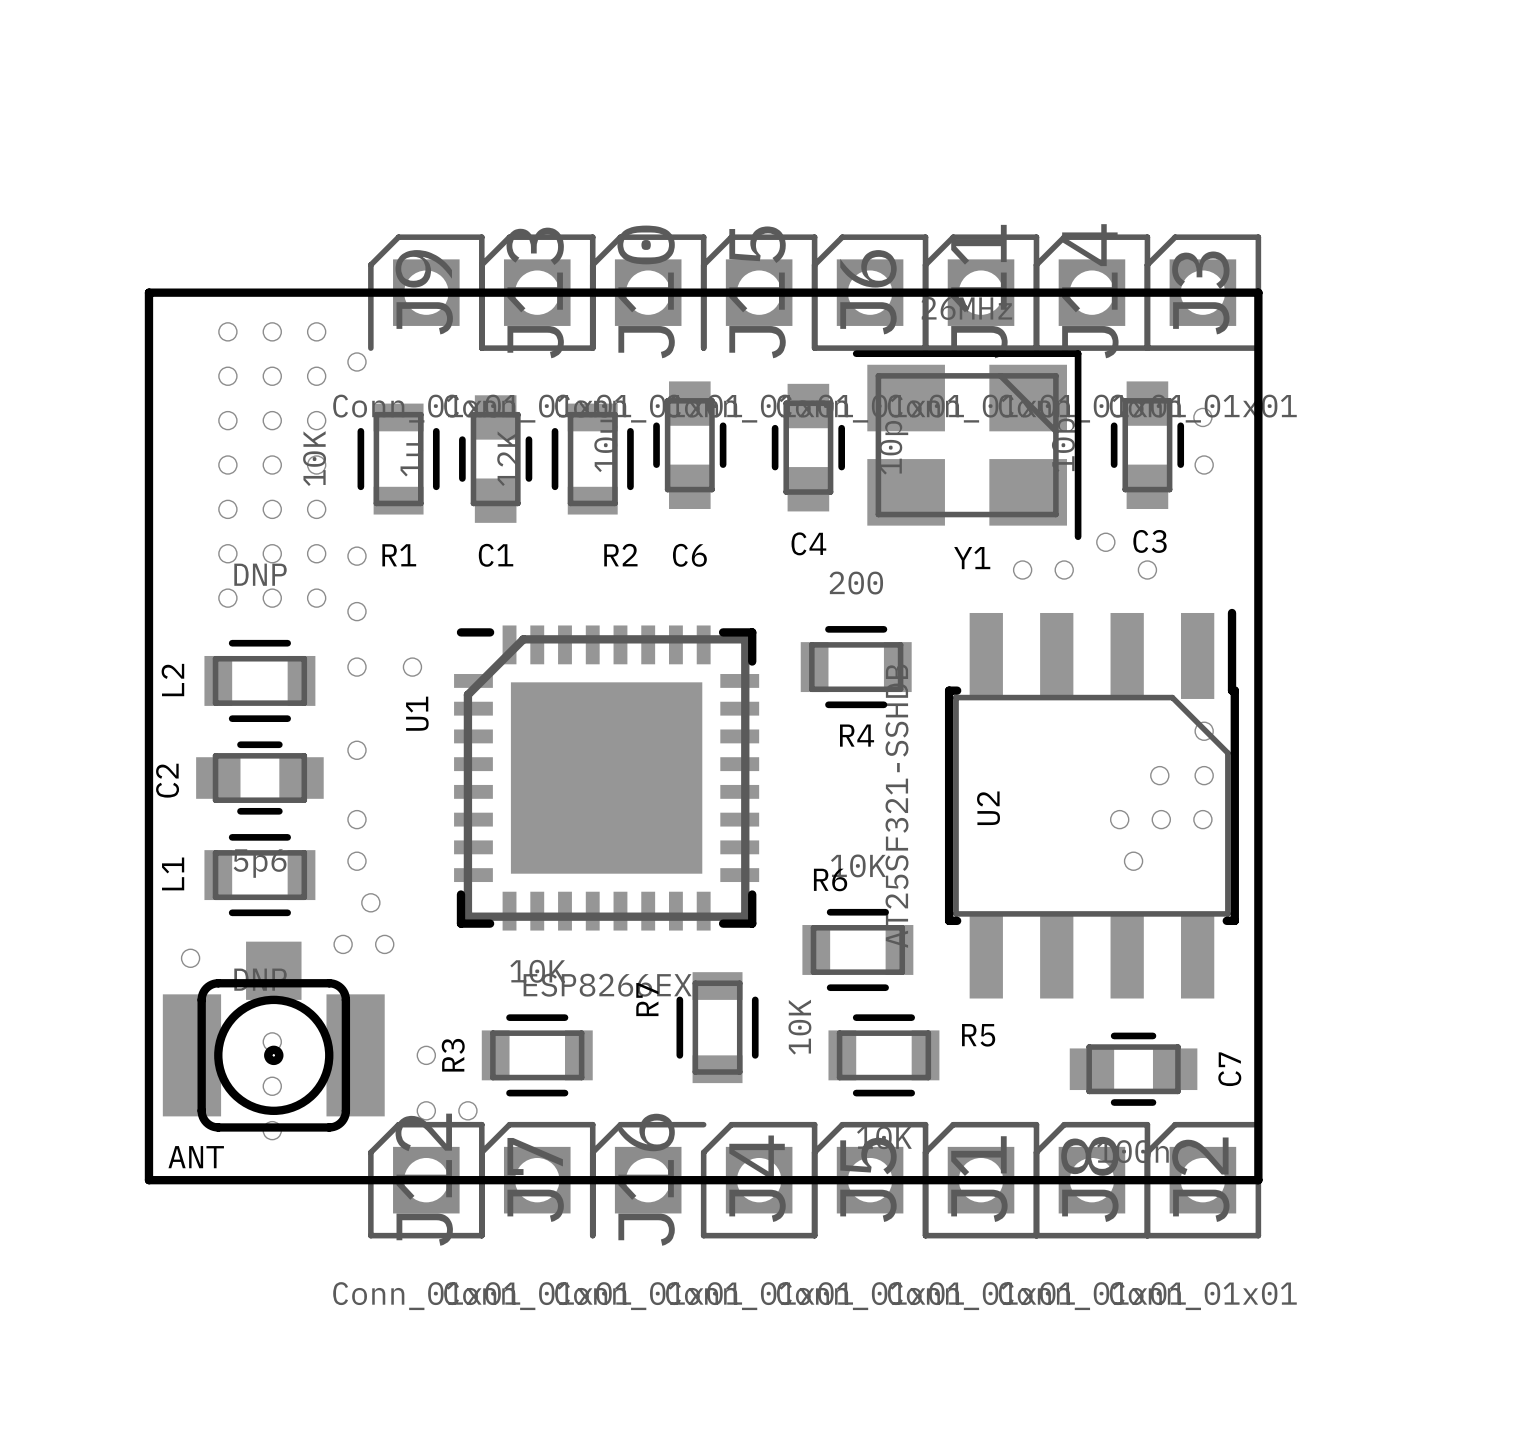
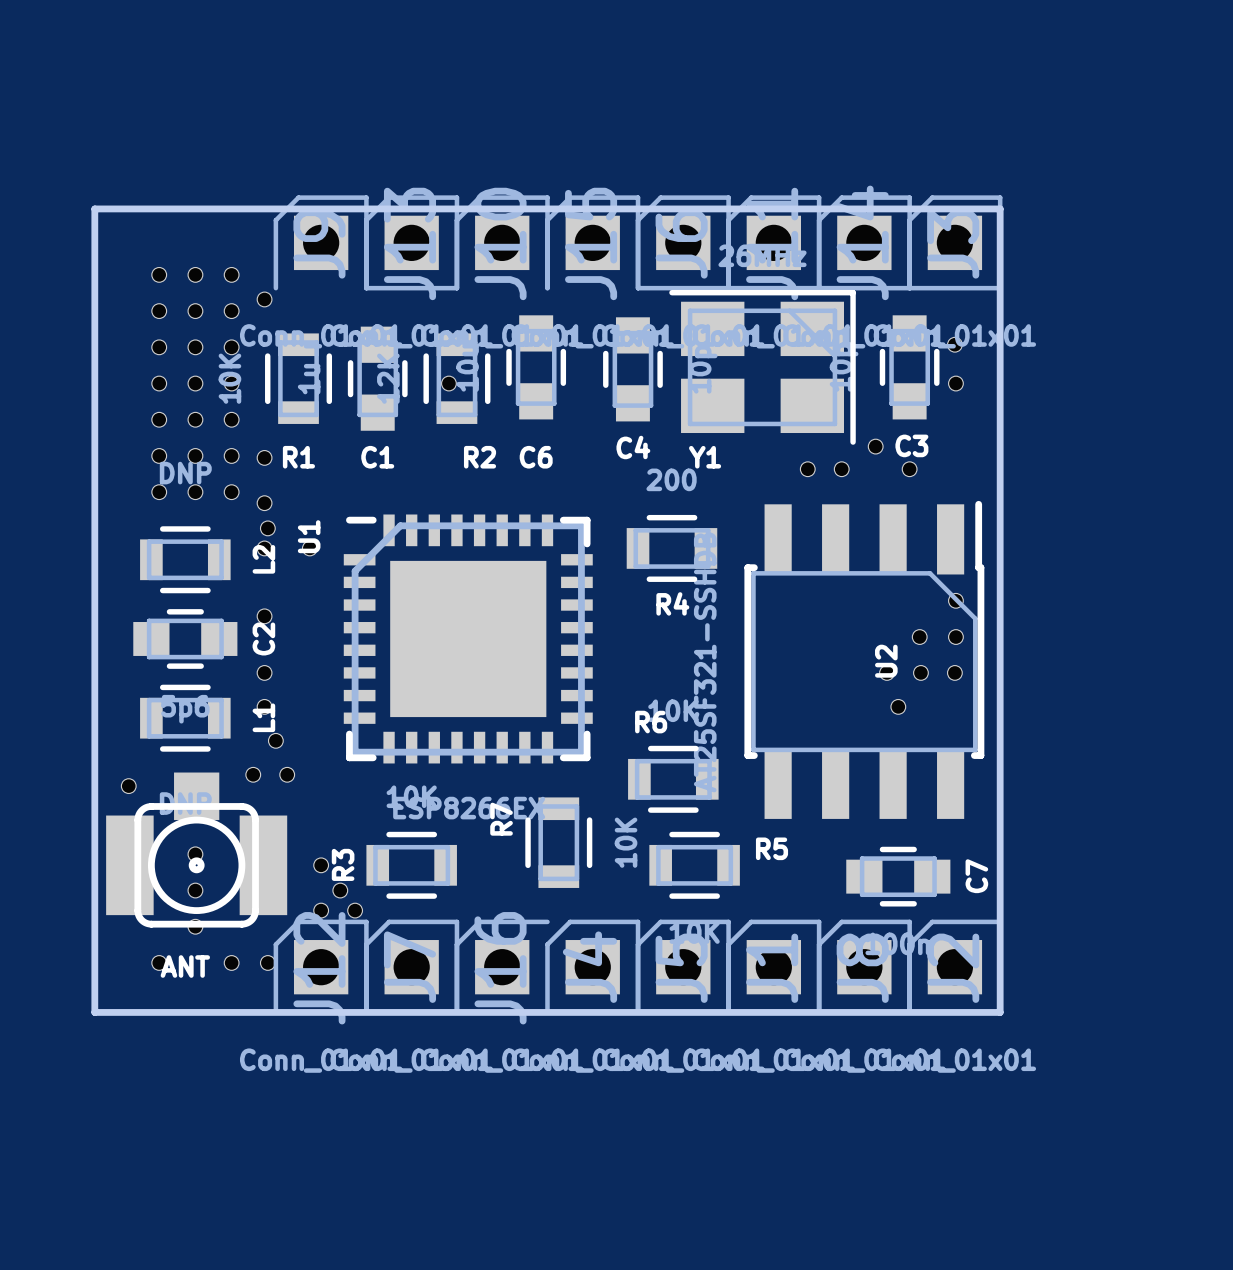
board edge: (148, 292) (1258, 292) -> (94, 242) (94, 208) (1000, 208) (1000, 242)
part: none -> (448, 383)
Y1 name position: Y1 (972, 558) -> Y1 (705, 457)
part: none -> (267, 528)
L2 name position: L2 (172, 680) -> L2 (263, 559)
U1 name position: U1 (417, 713) -> U1 (309, 536)
C2 name position: C2 (167, 780) -> C2 (263, 638)
U2 name position: U2 (988, 808) -> U2 (886, 661)
L1 name position: L1 (173, 873) -> L1 (263, 717)
part: none -> (340, 890)
ANT name position: ANT (196, 1157) -> ANT (185, 966)
part: none -> (159, 962)
part: none -> (231, 962)
part: none -> (267, 962)
board edge: (148, 1180) (1258, 1180) -> (94, 967) (94, 1012) (1000, 1012) (1000, 967)

